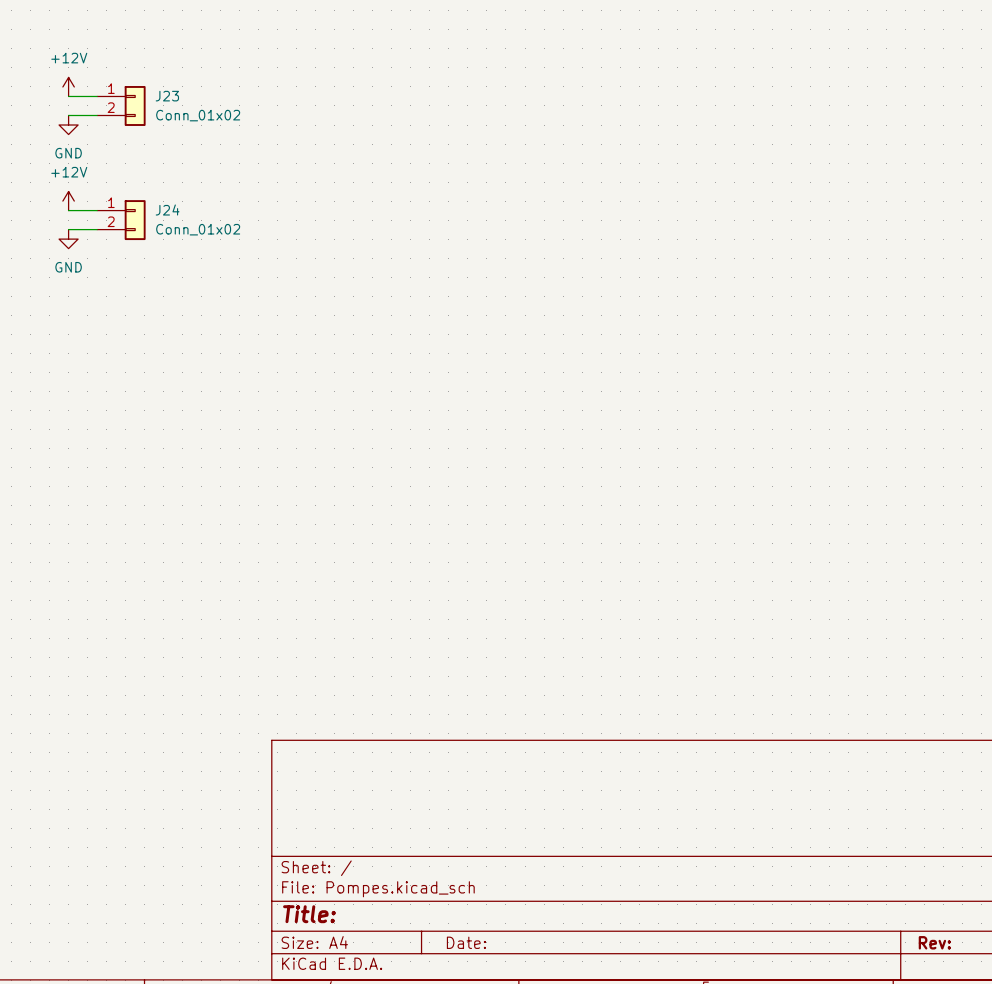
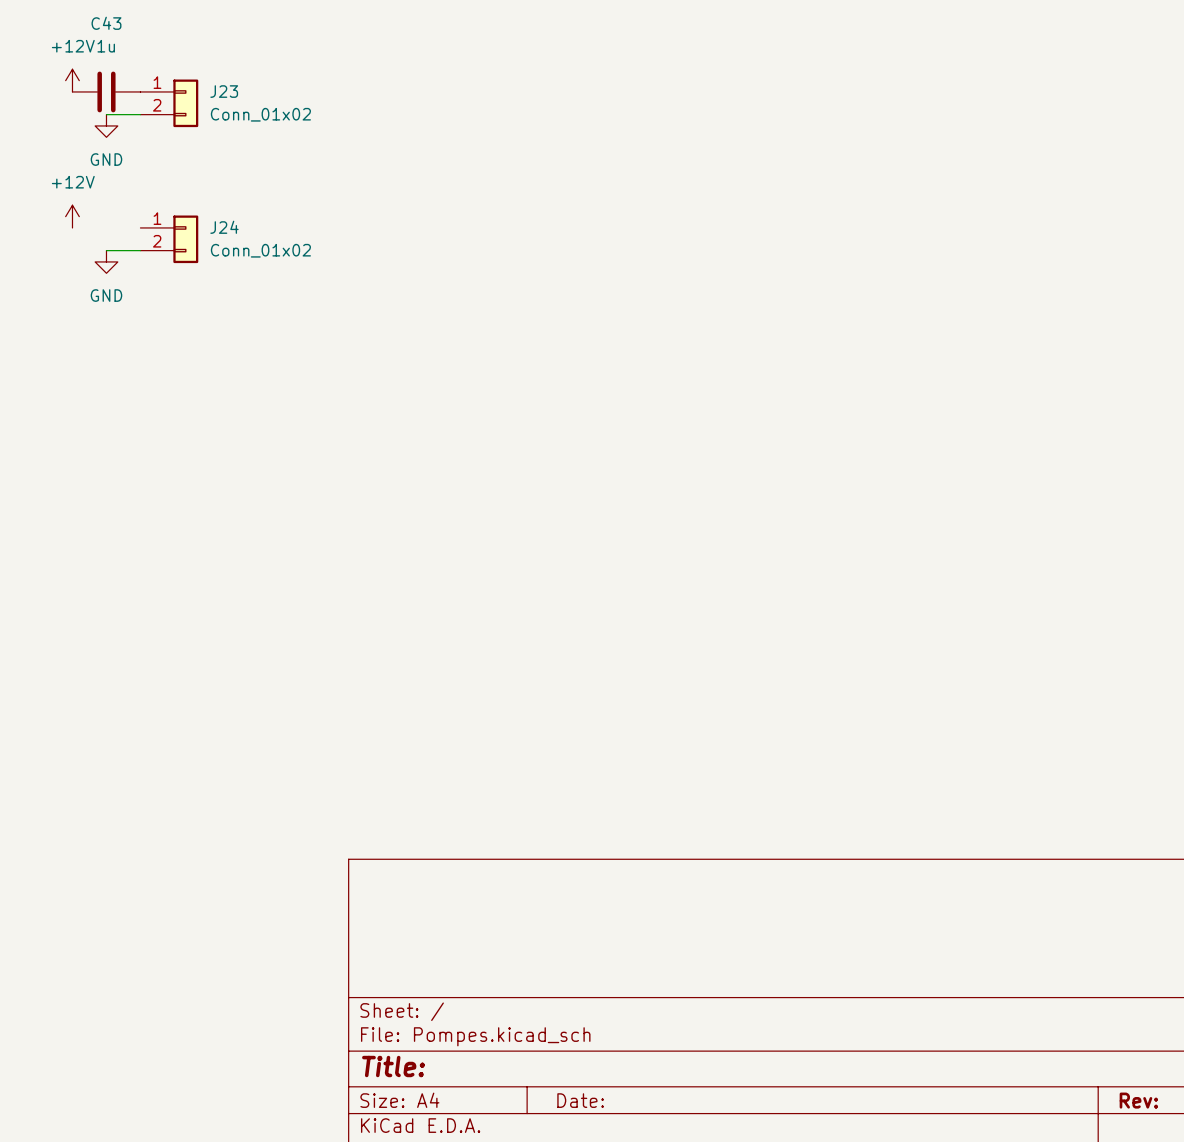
power symbol position: +12V (68, 86) -> +12V (72, 80)
C43: none -> 1u (106, 91)
power symbol position: +12V (68, 201) -> +12V (72, 216)
wire: (68, 210) (97, 210) -> none

